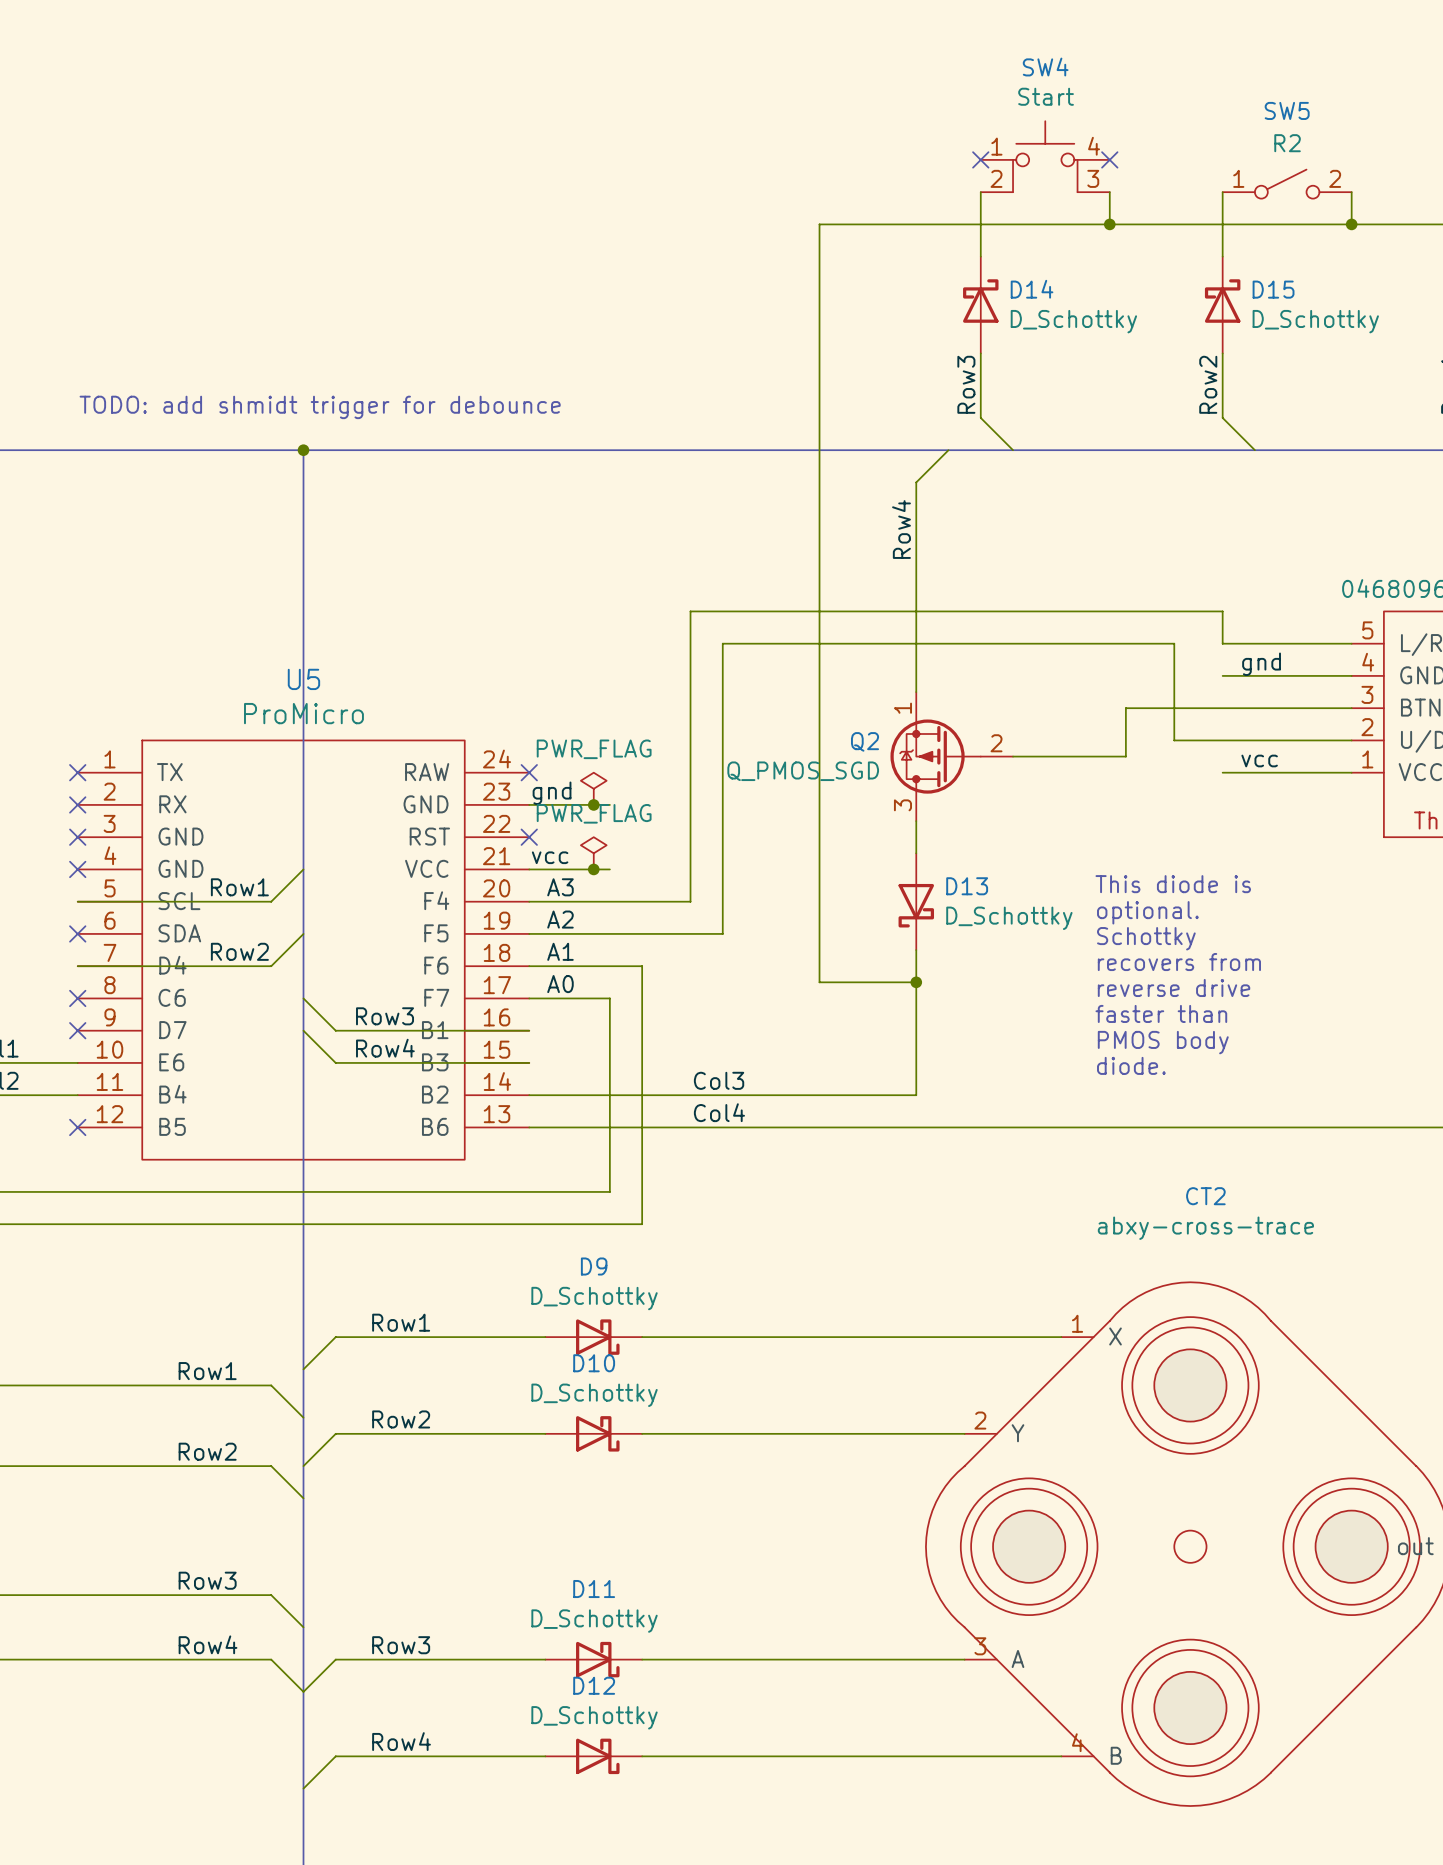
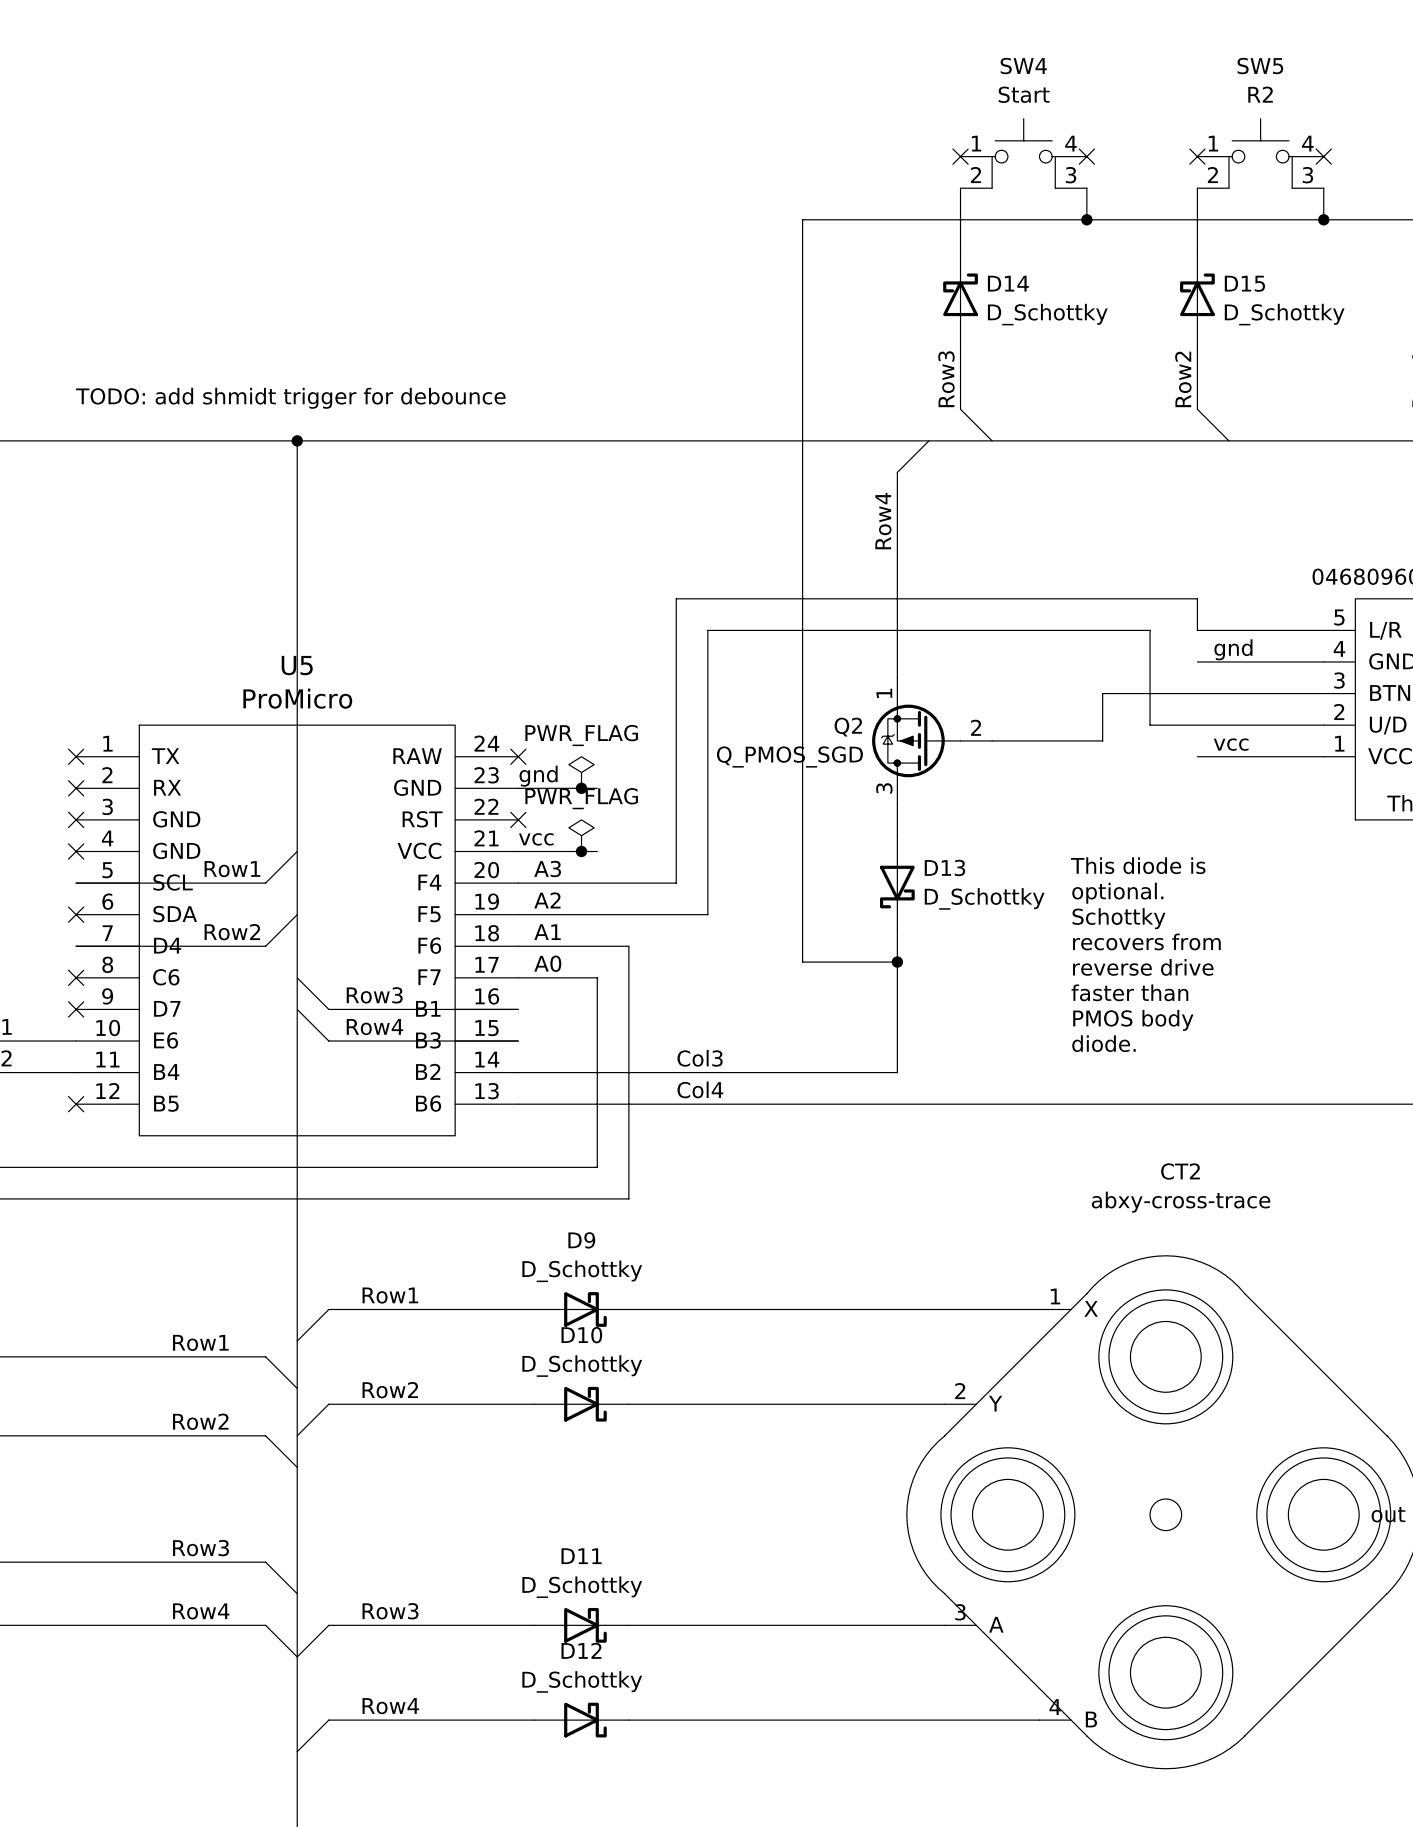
no-connect mark: none -> (1197, 156)
no-connect mark: none -> (1323, 156)
SW5 symbol: [1222, 169, 1352, 199] -> [1197, 118, 1324, 189]

